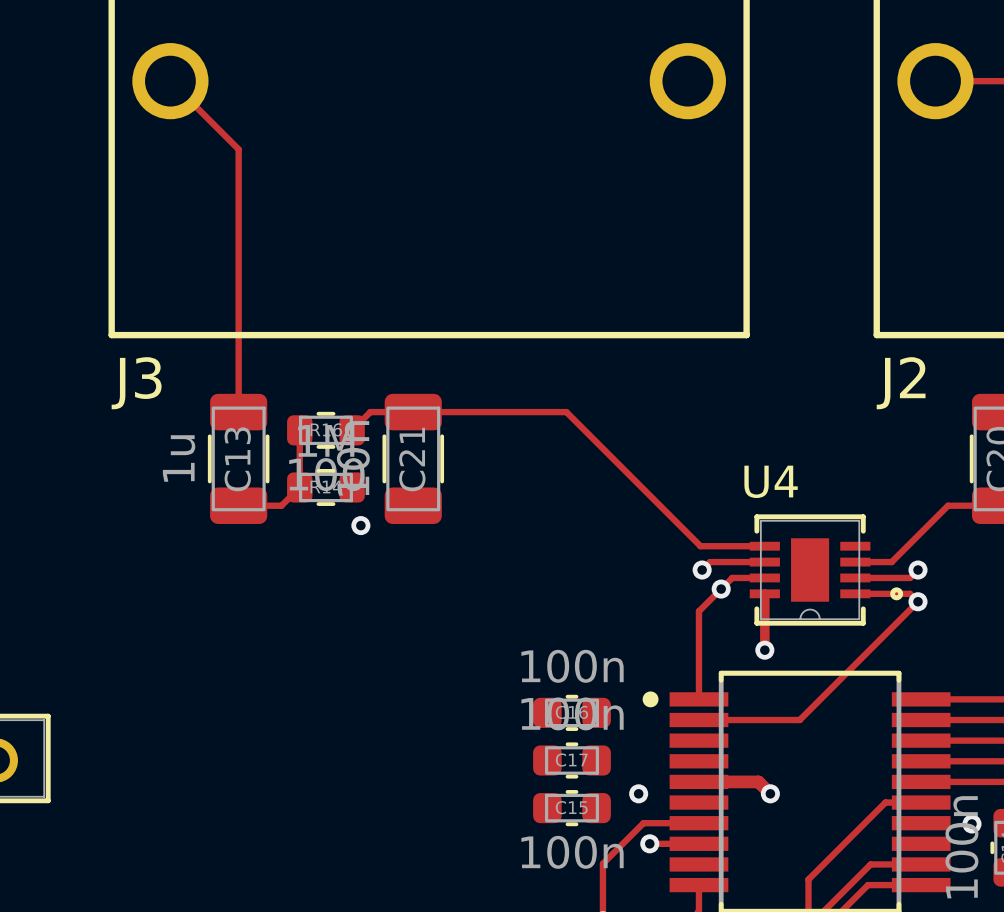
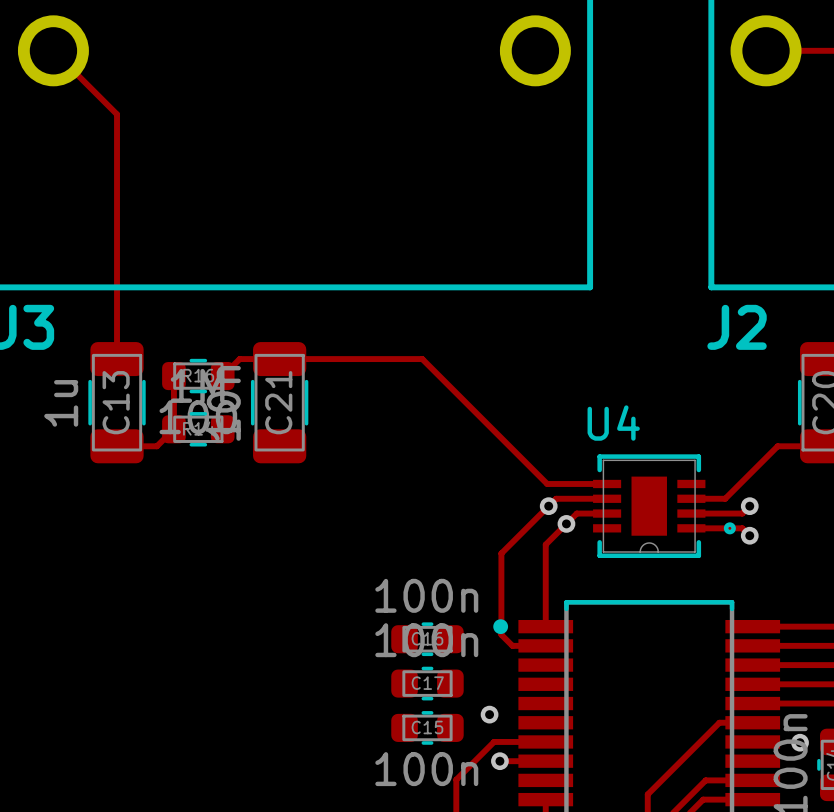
via: (360, 525) -> none
track: (764, 593) (764, 650) -> none
track: (918, 601) (799, 720) (698, 720) -> (548, 506) (501, 553) (501, 634) (512, 645) (545, 645)
via: (764, 650) -> none
track: (698, 781) (758, 781) (770, 793) -> none
via: (770, 793) -> none

